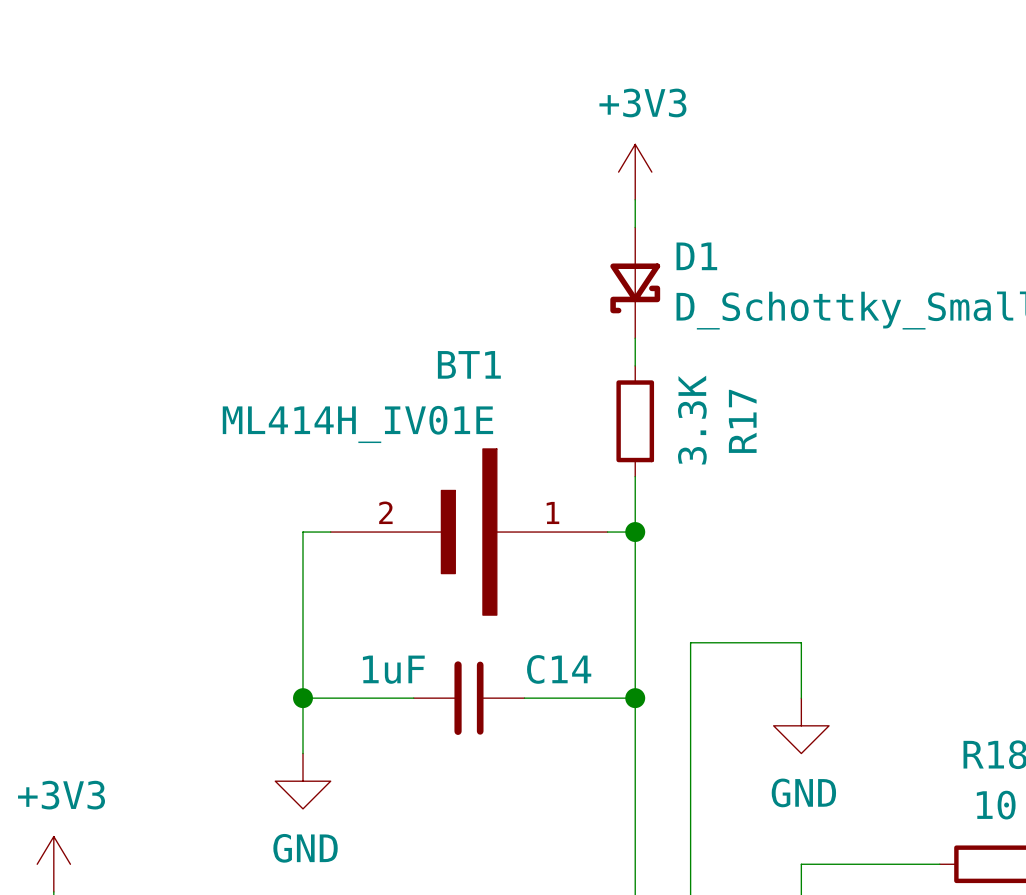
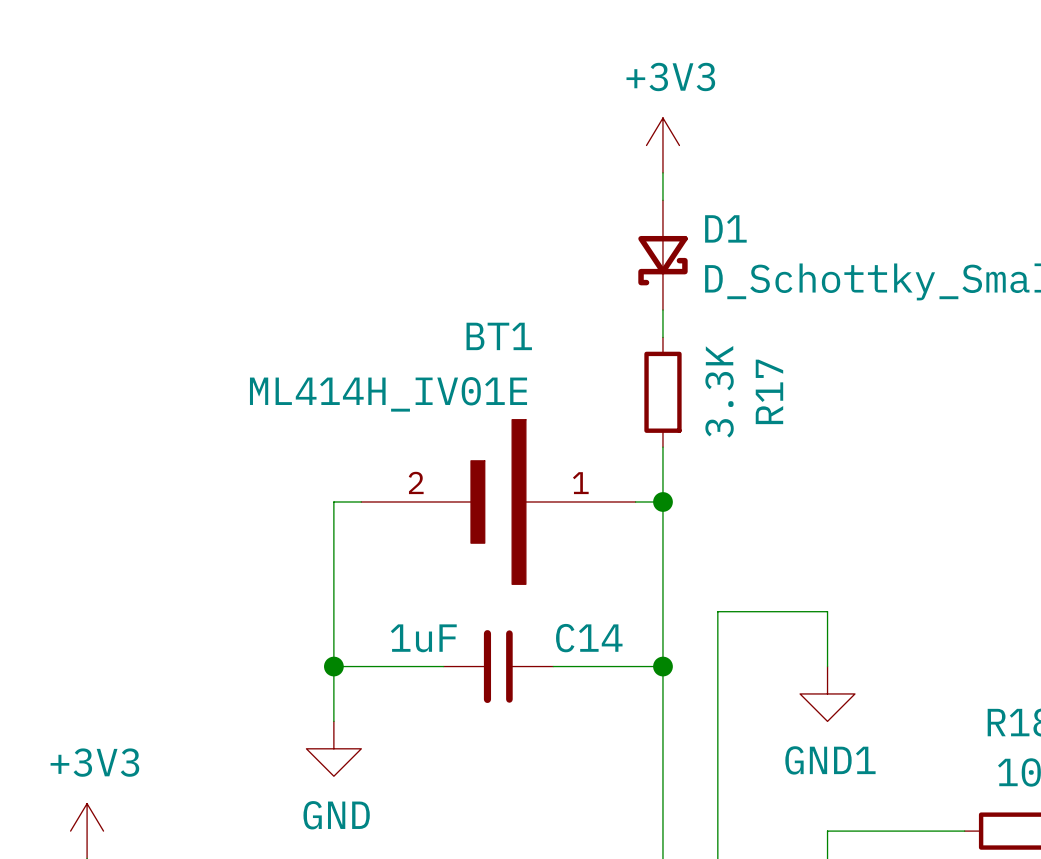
power symbol: GND (801, 725) -> GND1 (827, 693)

